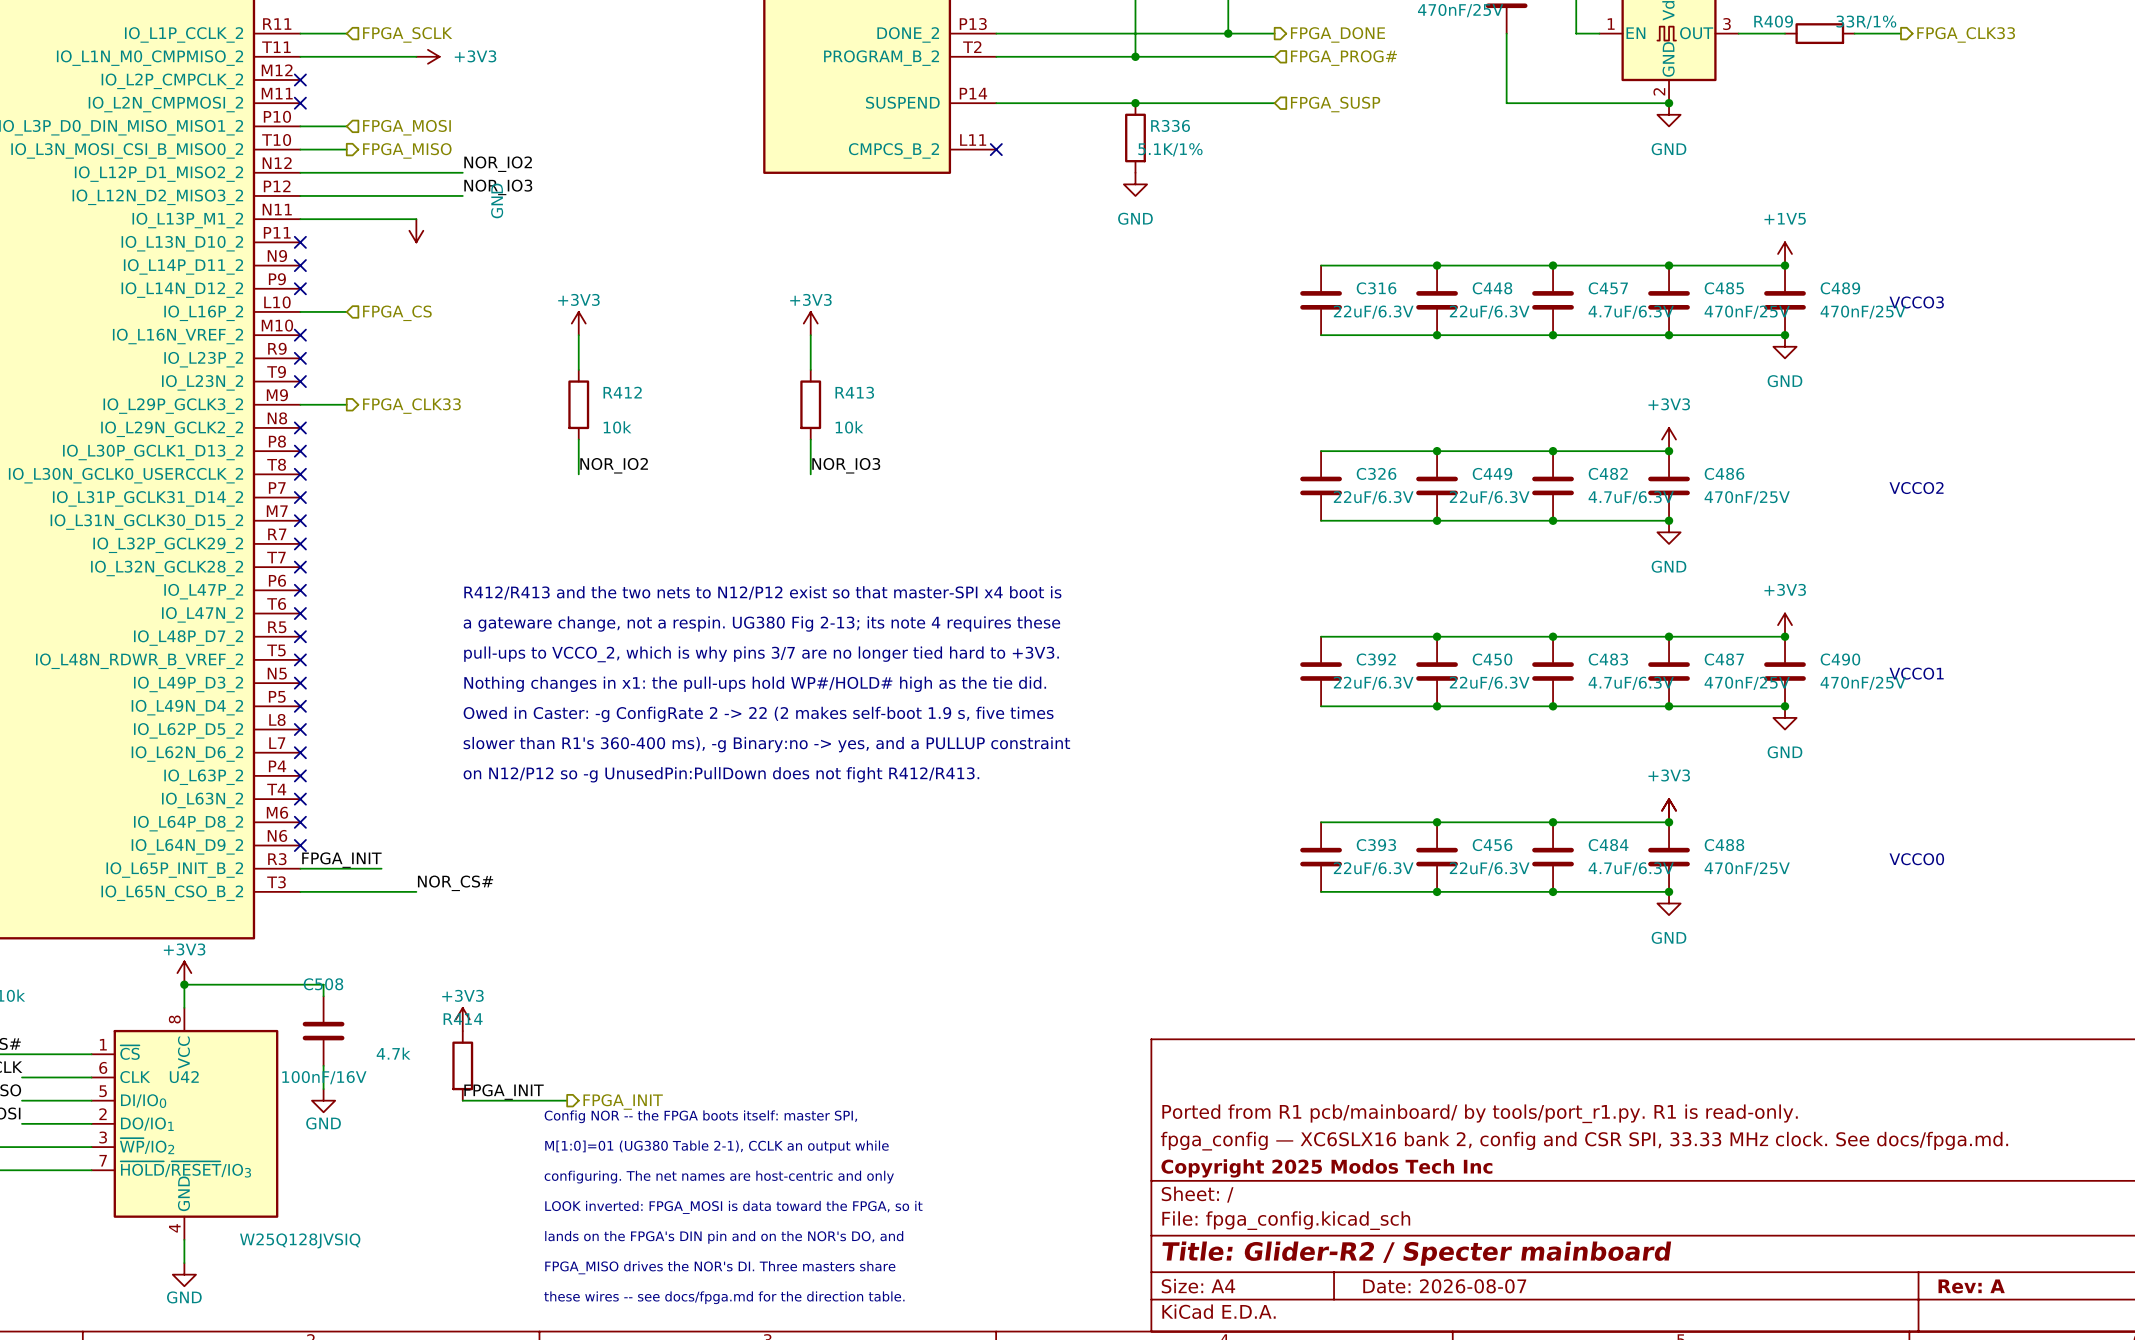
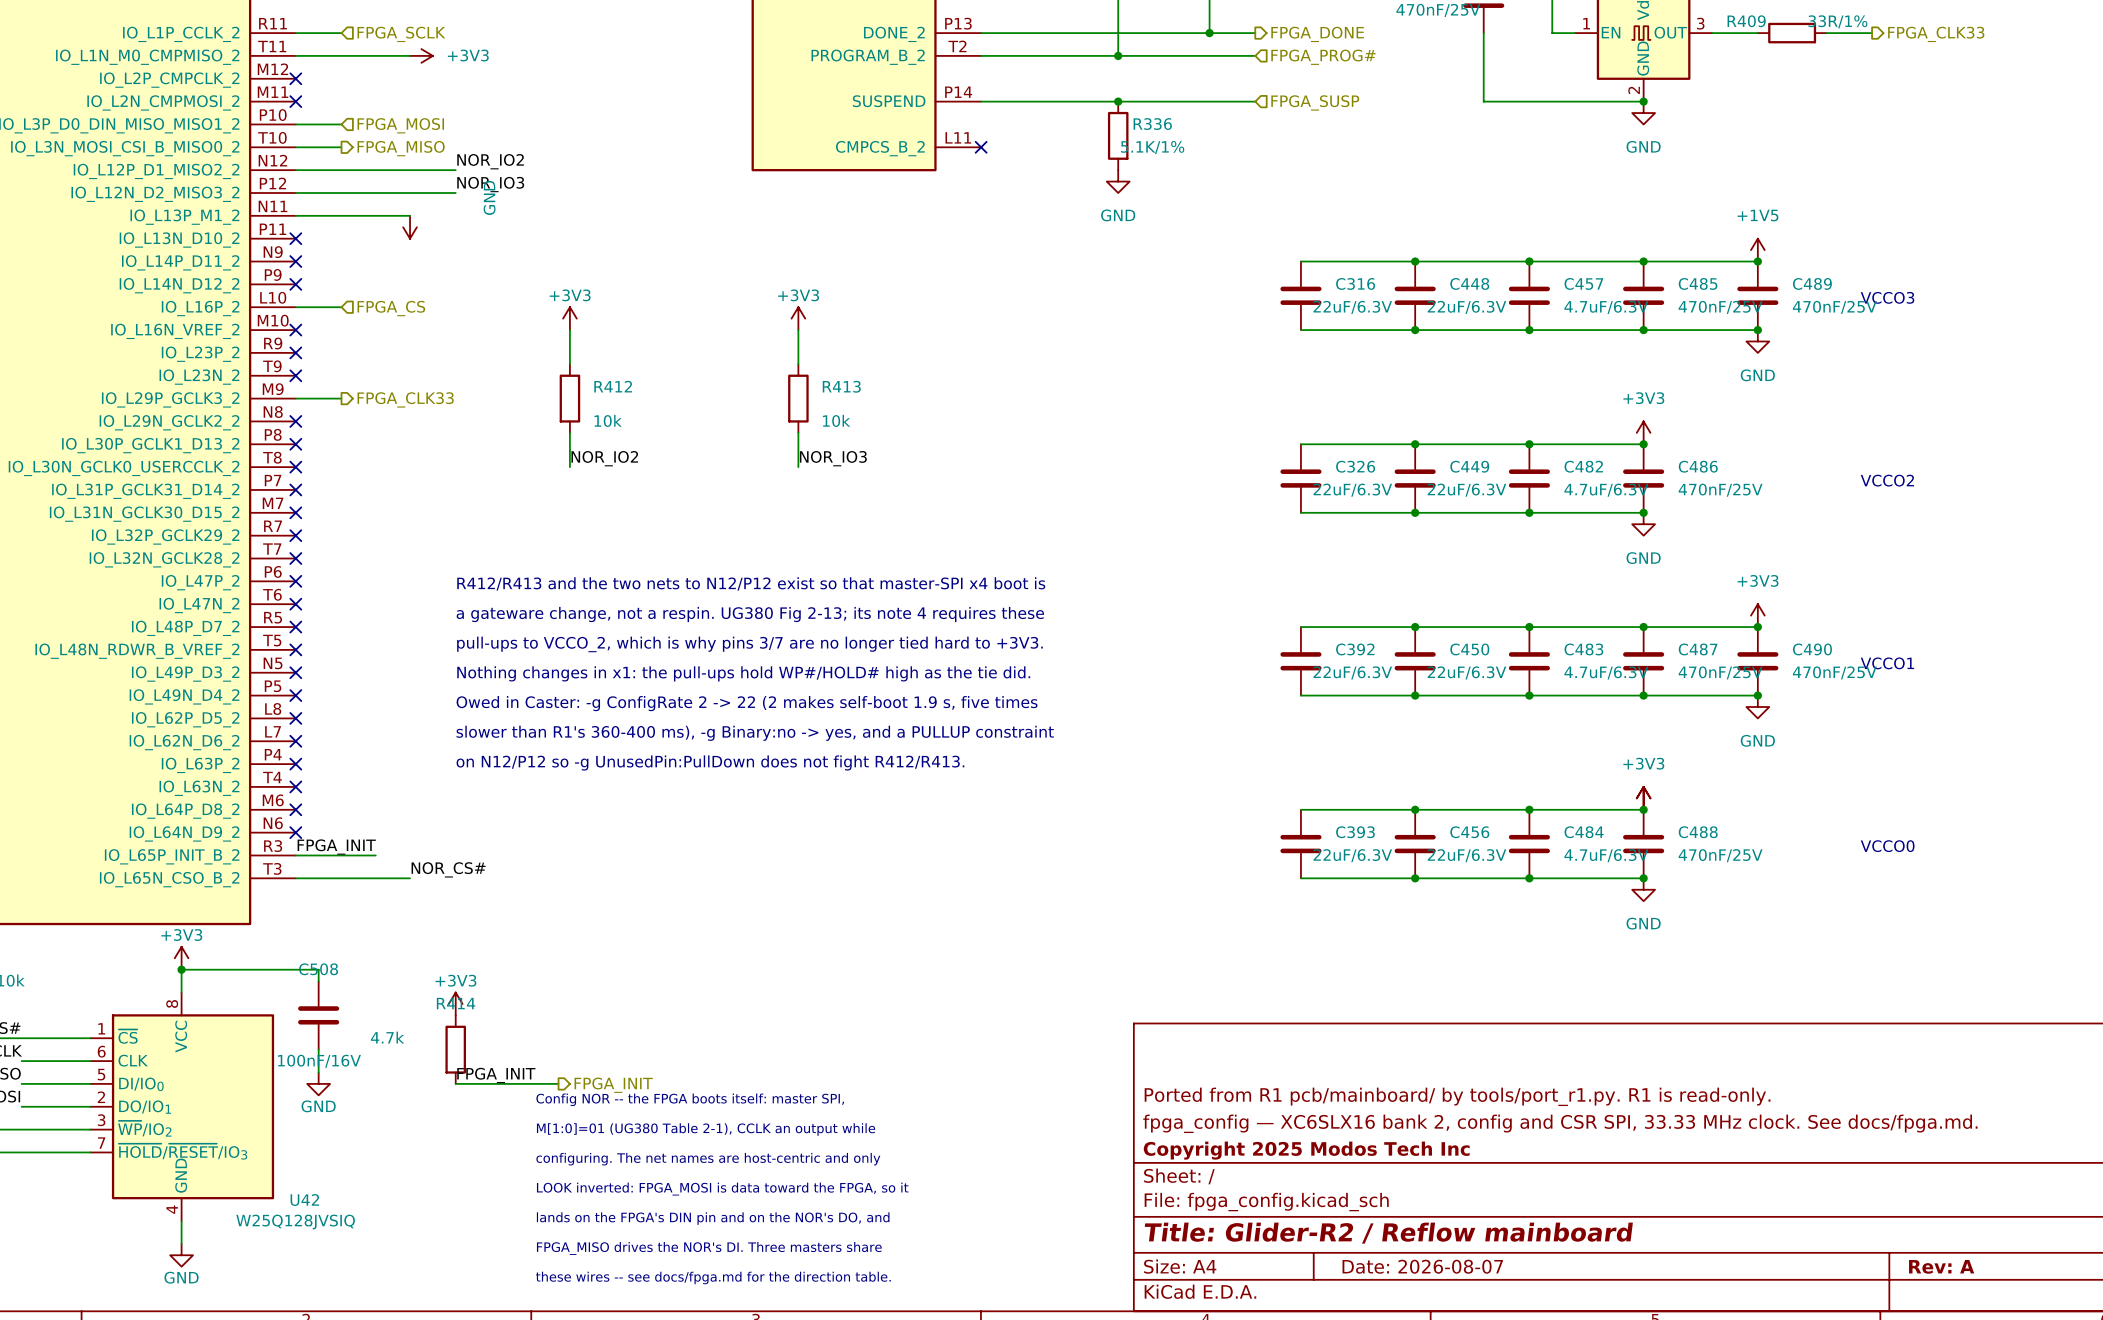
U42 name position: U42 (184, 1077) -> U42 (304, 1200)
title block: Title: Glider-R2 / Specter mainboard (1416, 1253) -> Title: Glider-R2 / Reflow mainboard (1388, 1233)

